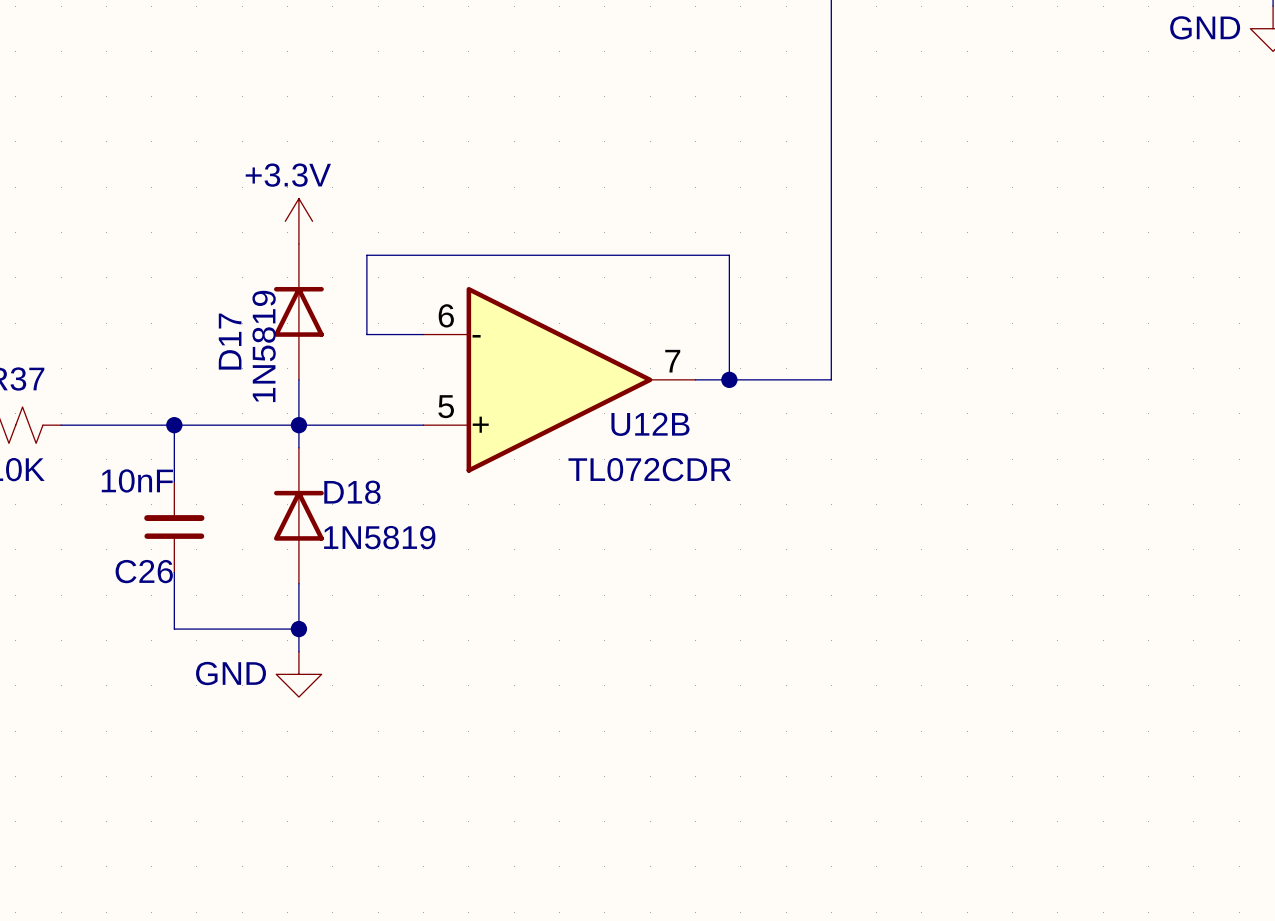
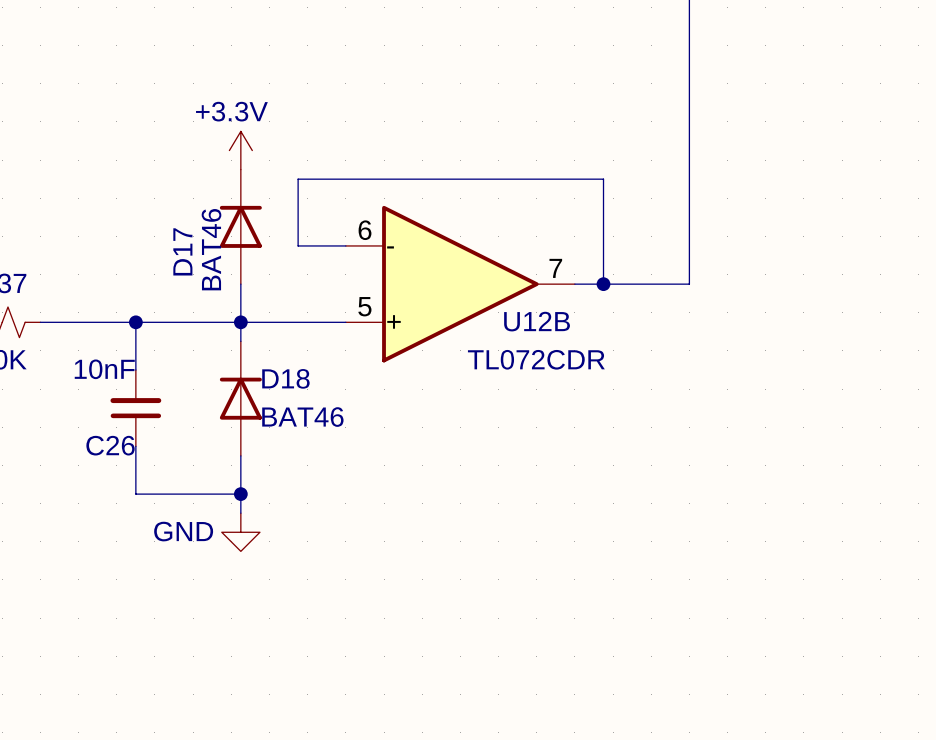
D17 value: 1N5819 (264, 346) -> BAT46 (211, 249)
D18 value: 1N5819 (379, 537) -> BAT46 (302, 417)

